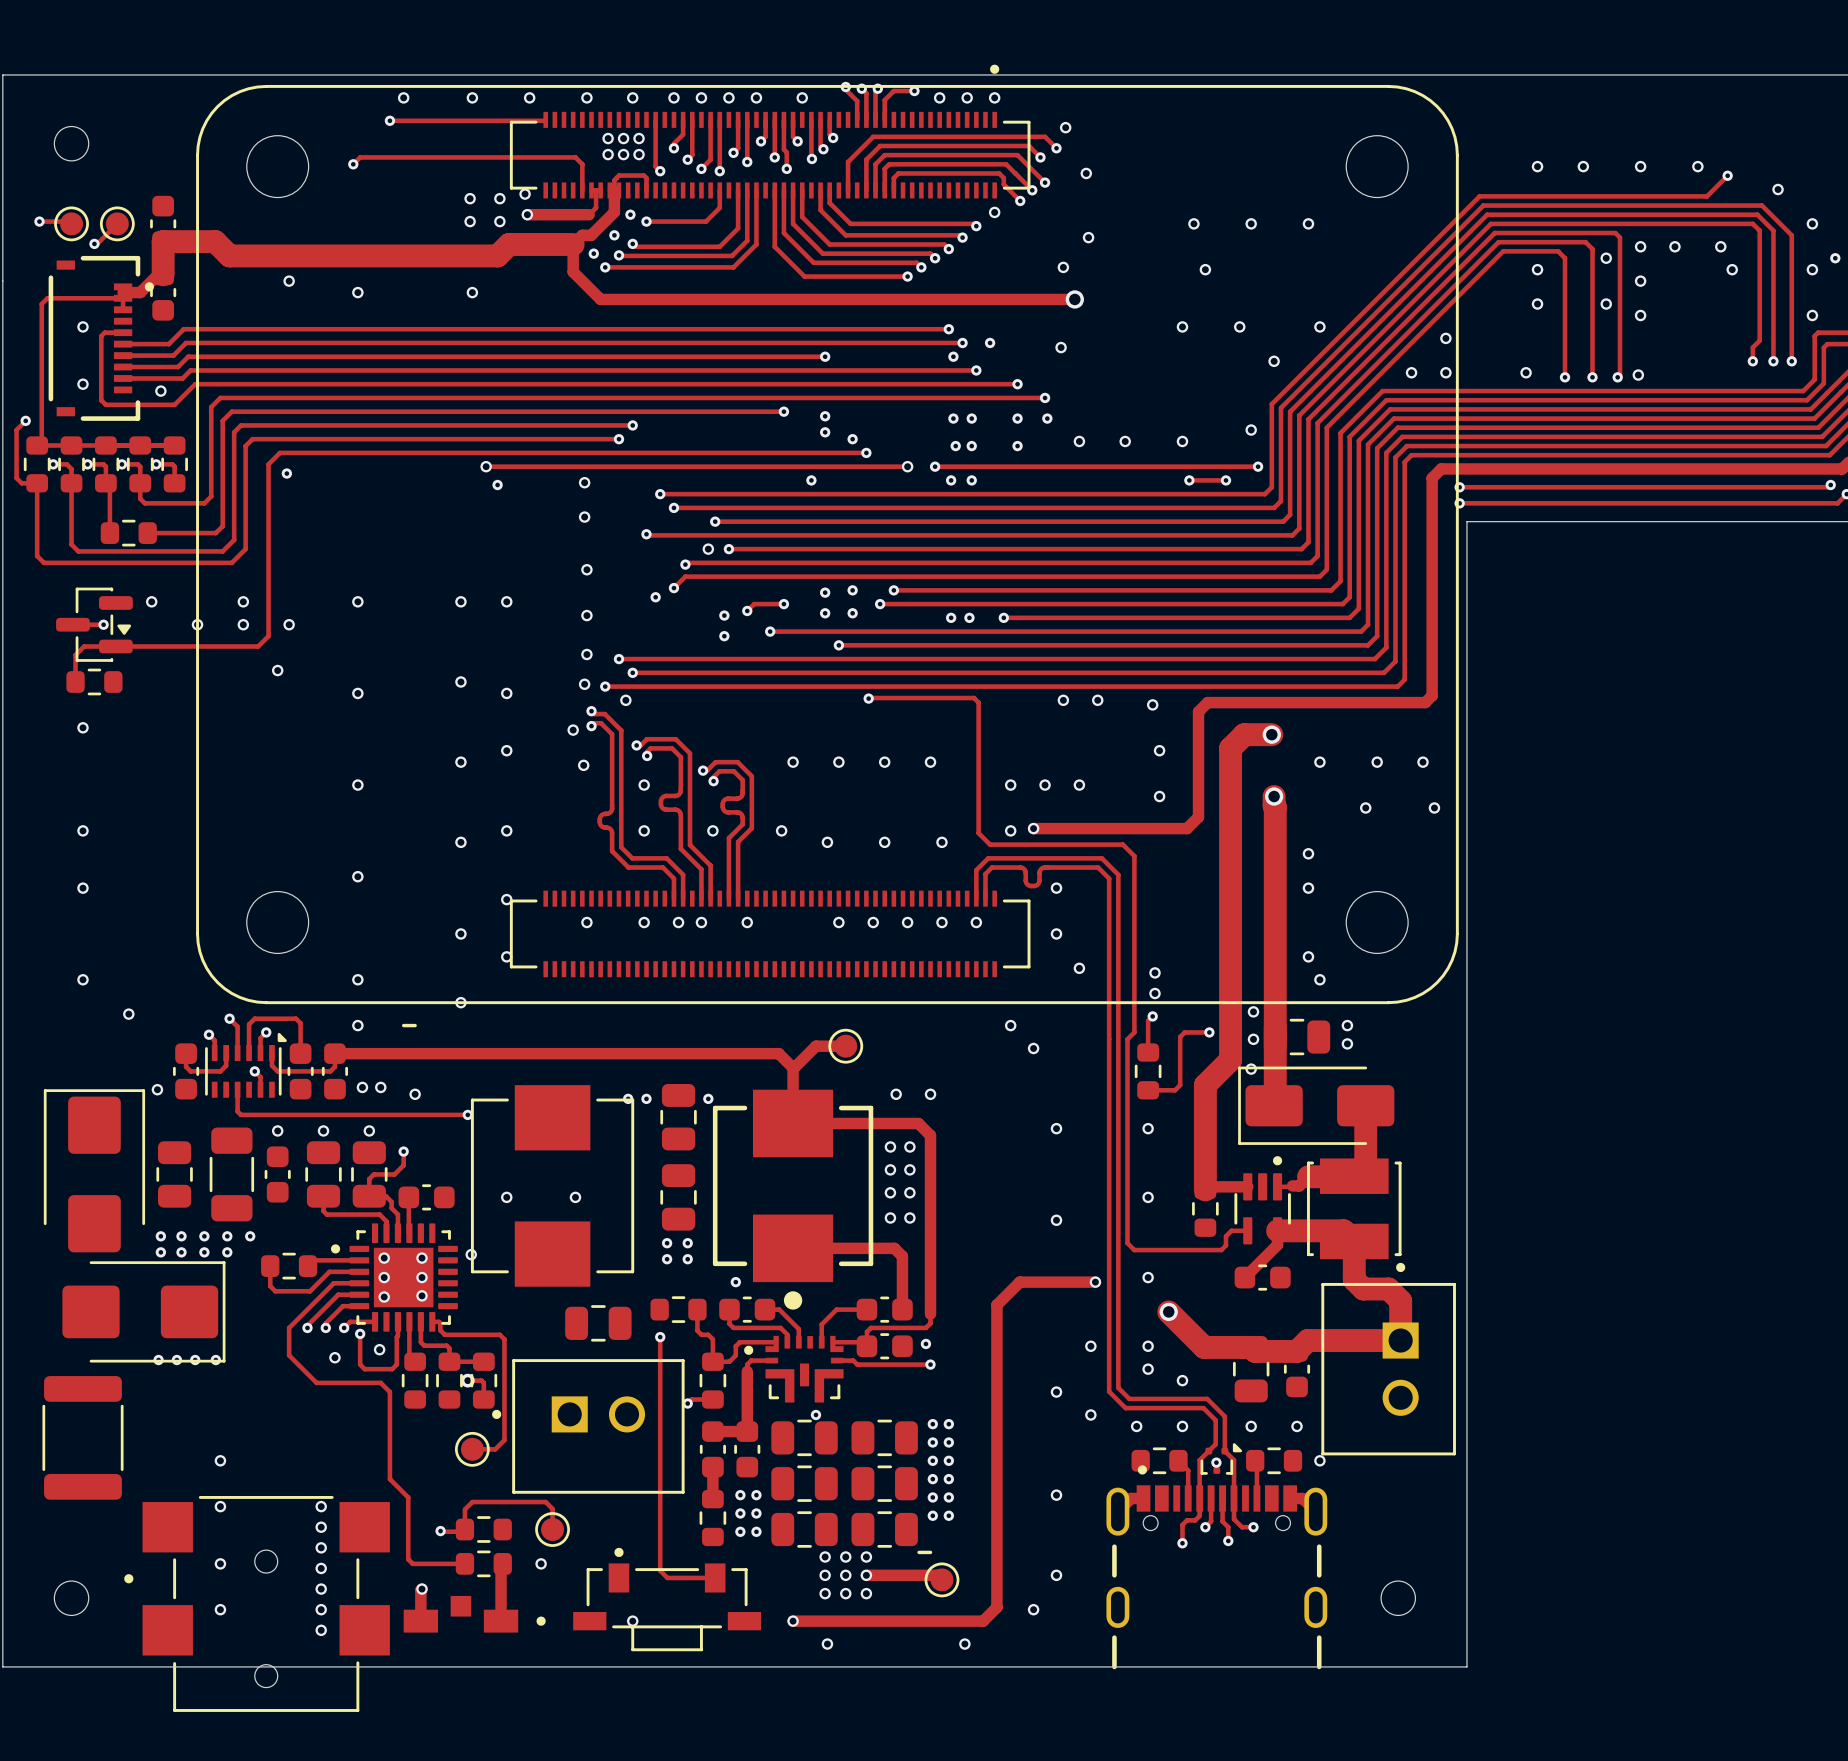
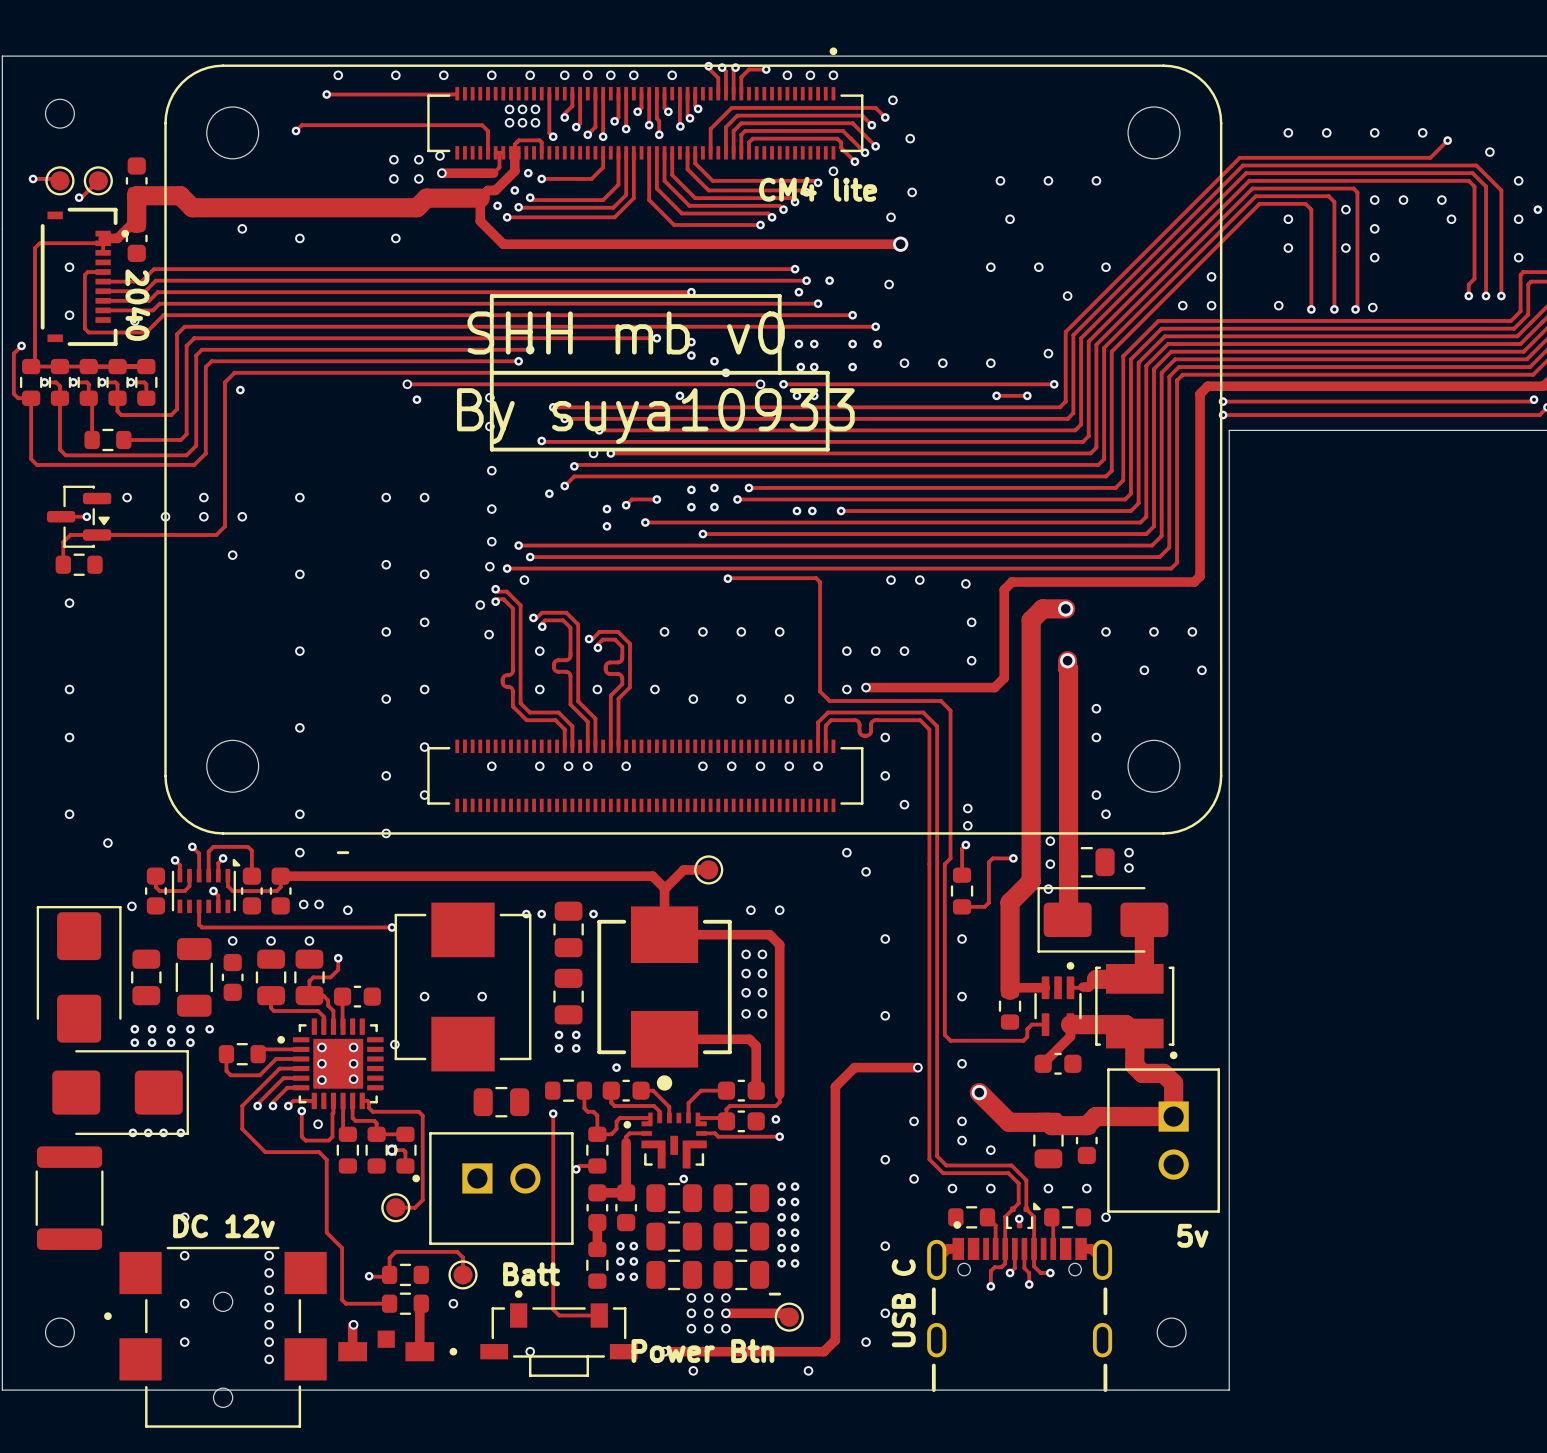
text: none -> CM4 lite (818, 189)
text: none -> 2040 (137, 305)
text: none -> SHH mb v0 (626, 332)
line: none -> (491, 372) (827, 372) (827, 449) (491, 449) (491, 296) (779, 296) (779, 372)
text: none -> By suya10933 (655, 416)
via: (334, 1357) -> none
text: none -> DC 12v (224, 1226)
text: none -> 5v (1192, 1235)
text: none -> Batt (531, 1274)
text: none -> USB C (903, 1303)
text: none -> Power Btn (702, 1350)

